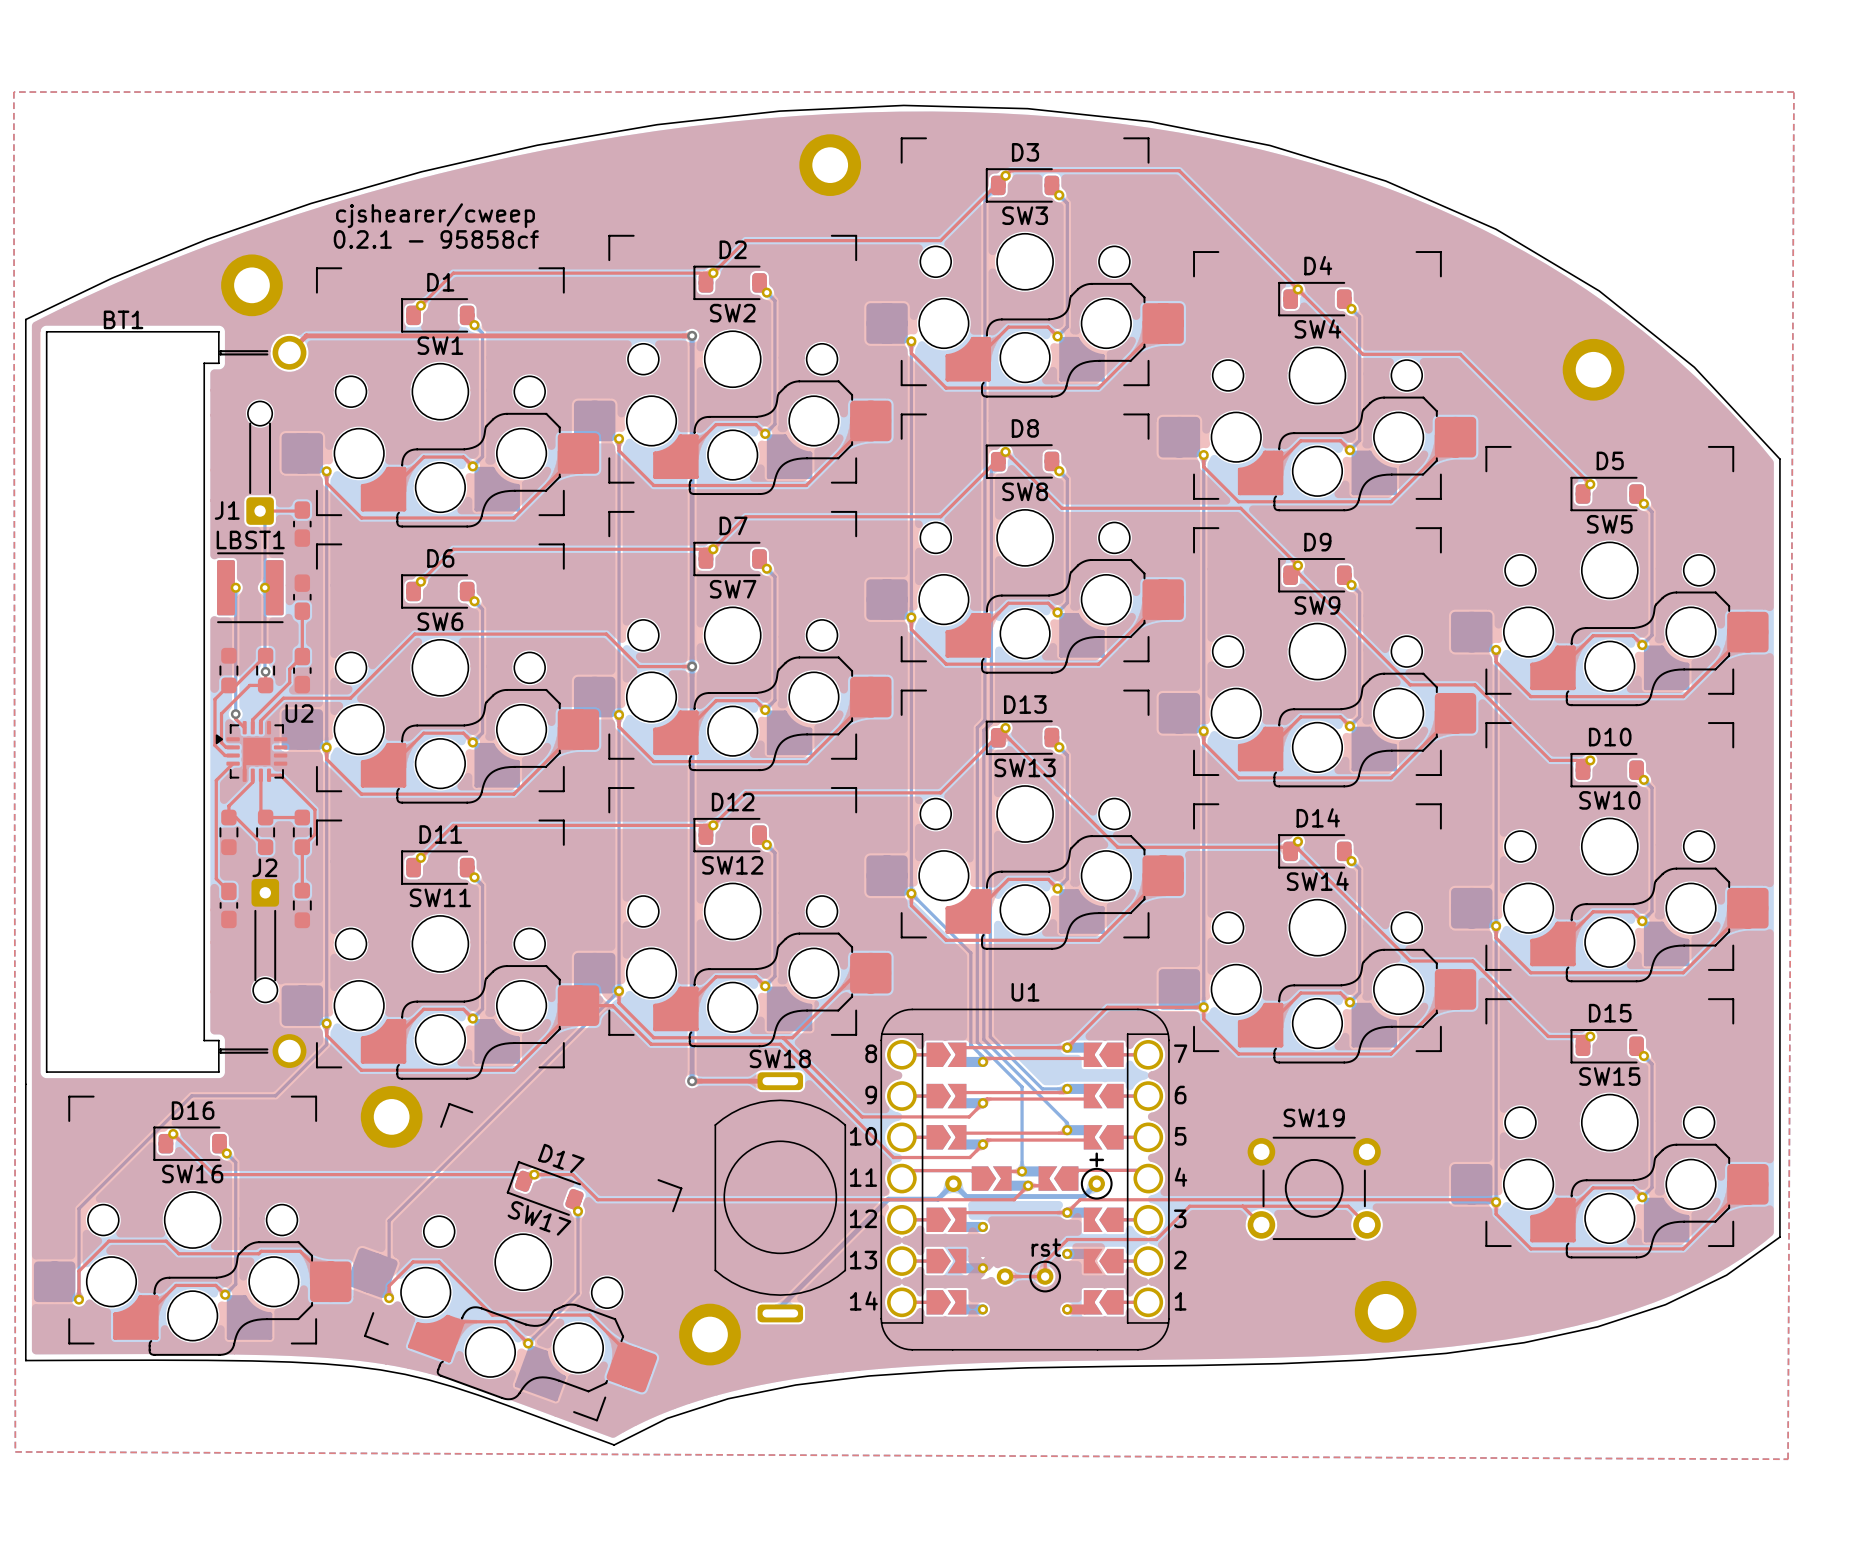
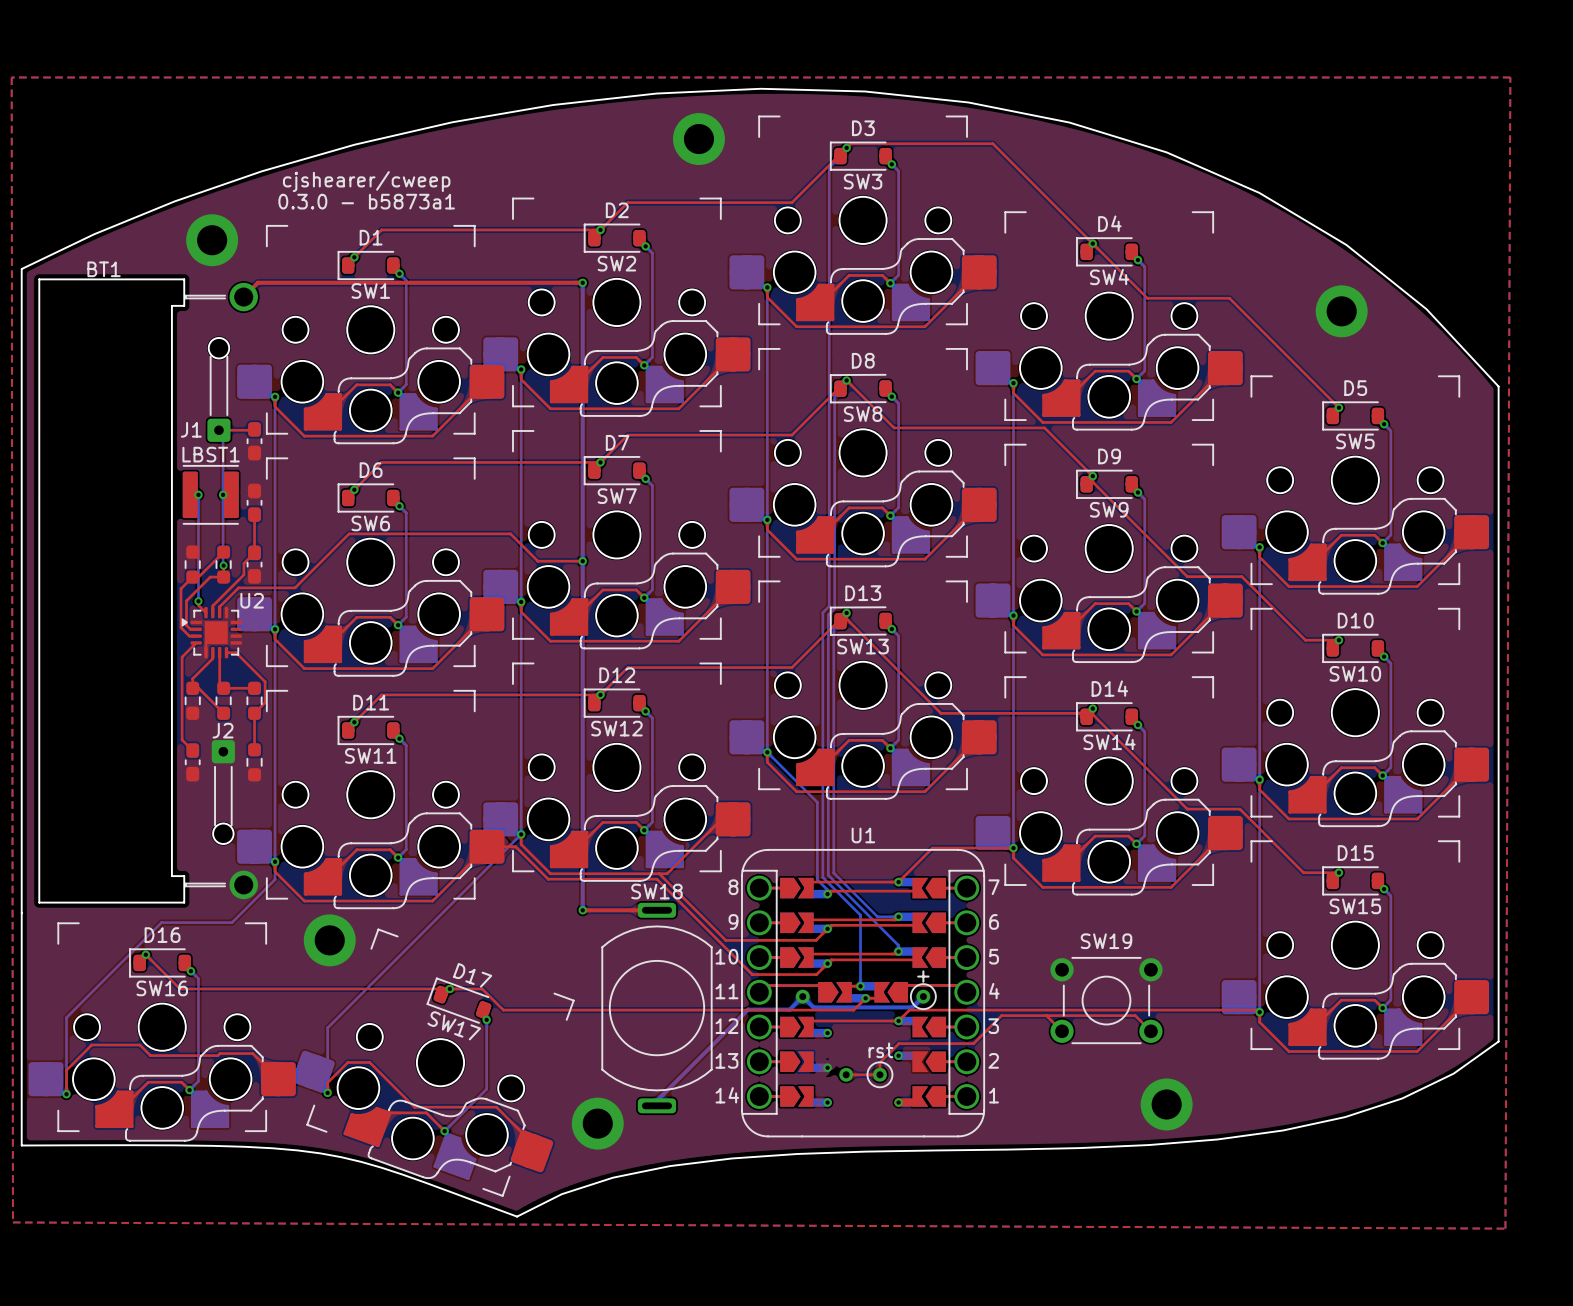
text: 0.2.1 - 95858cf (436, 239) -> 0.3.0 - b5873a1 (366, 201)

